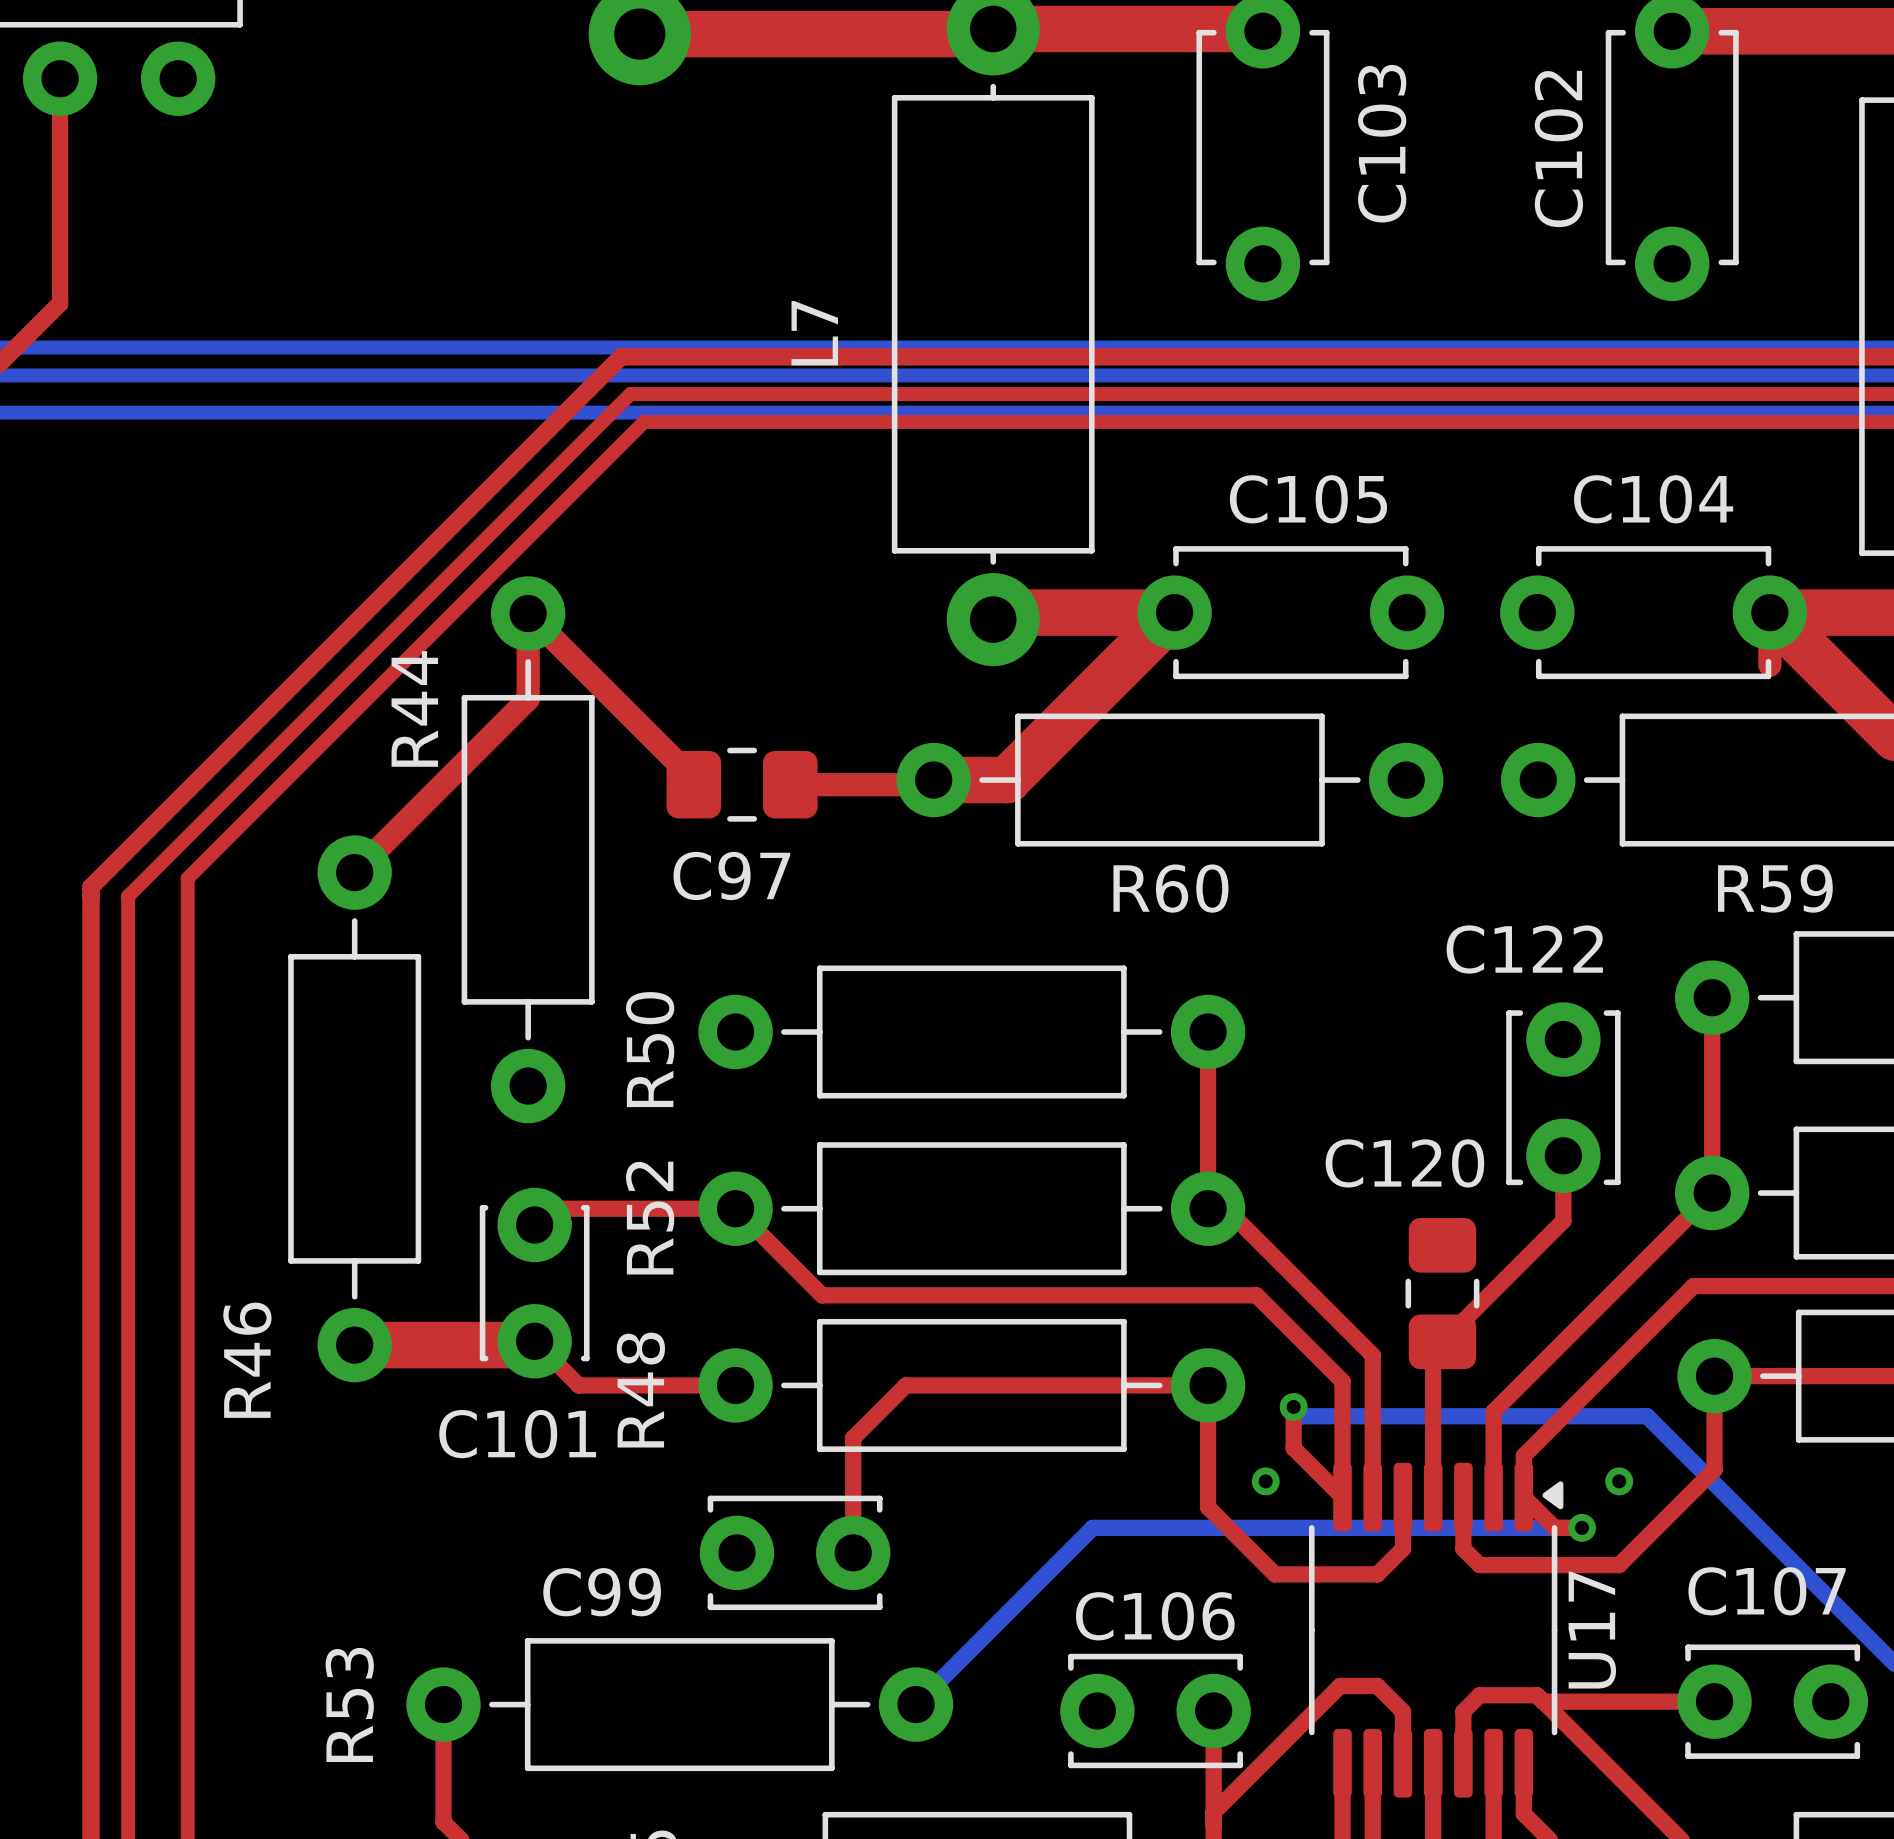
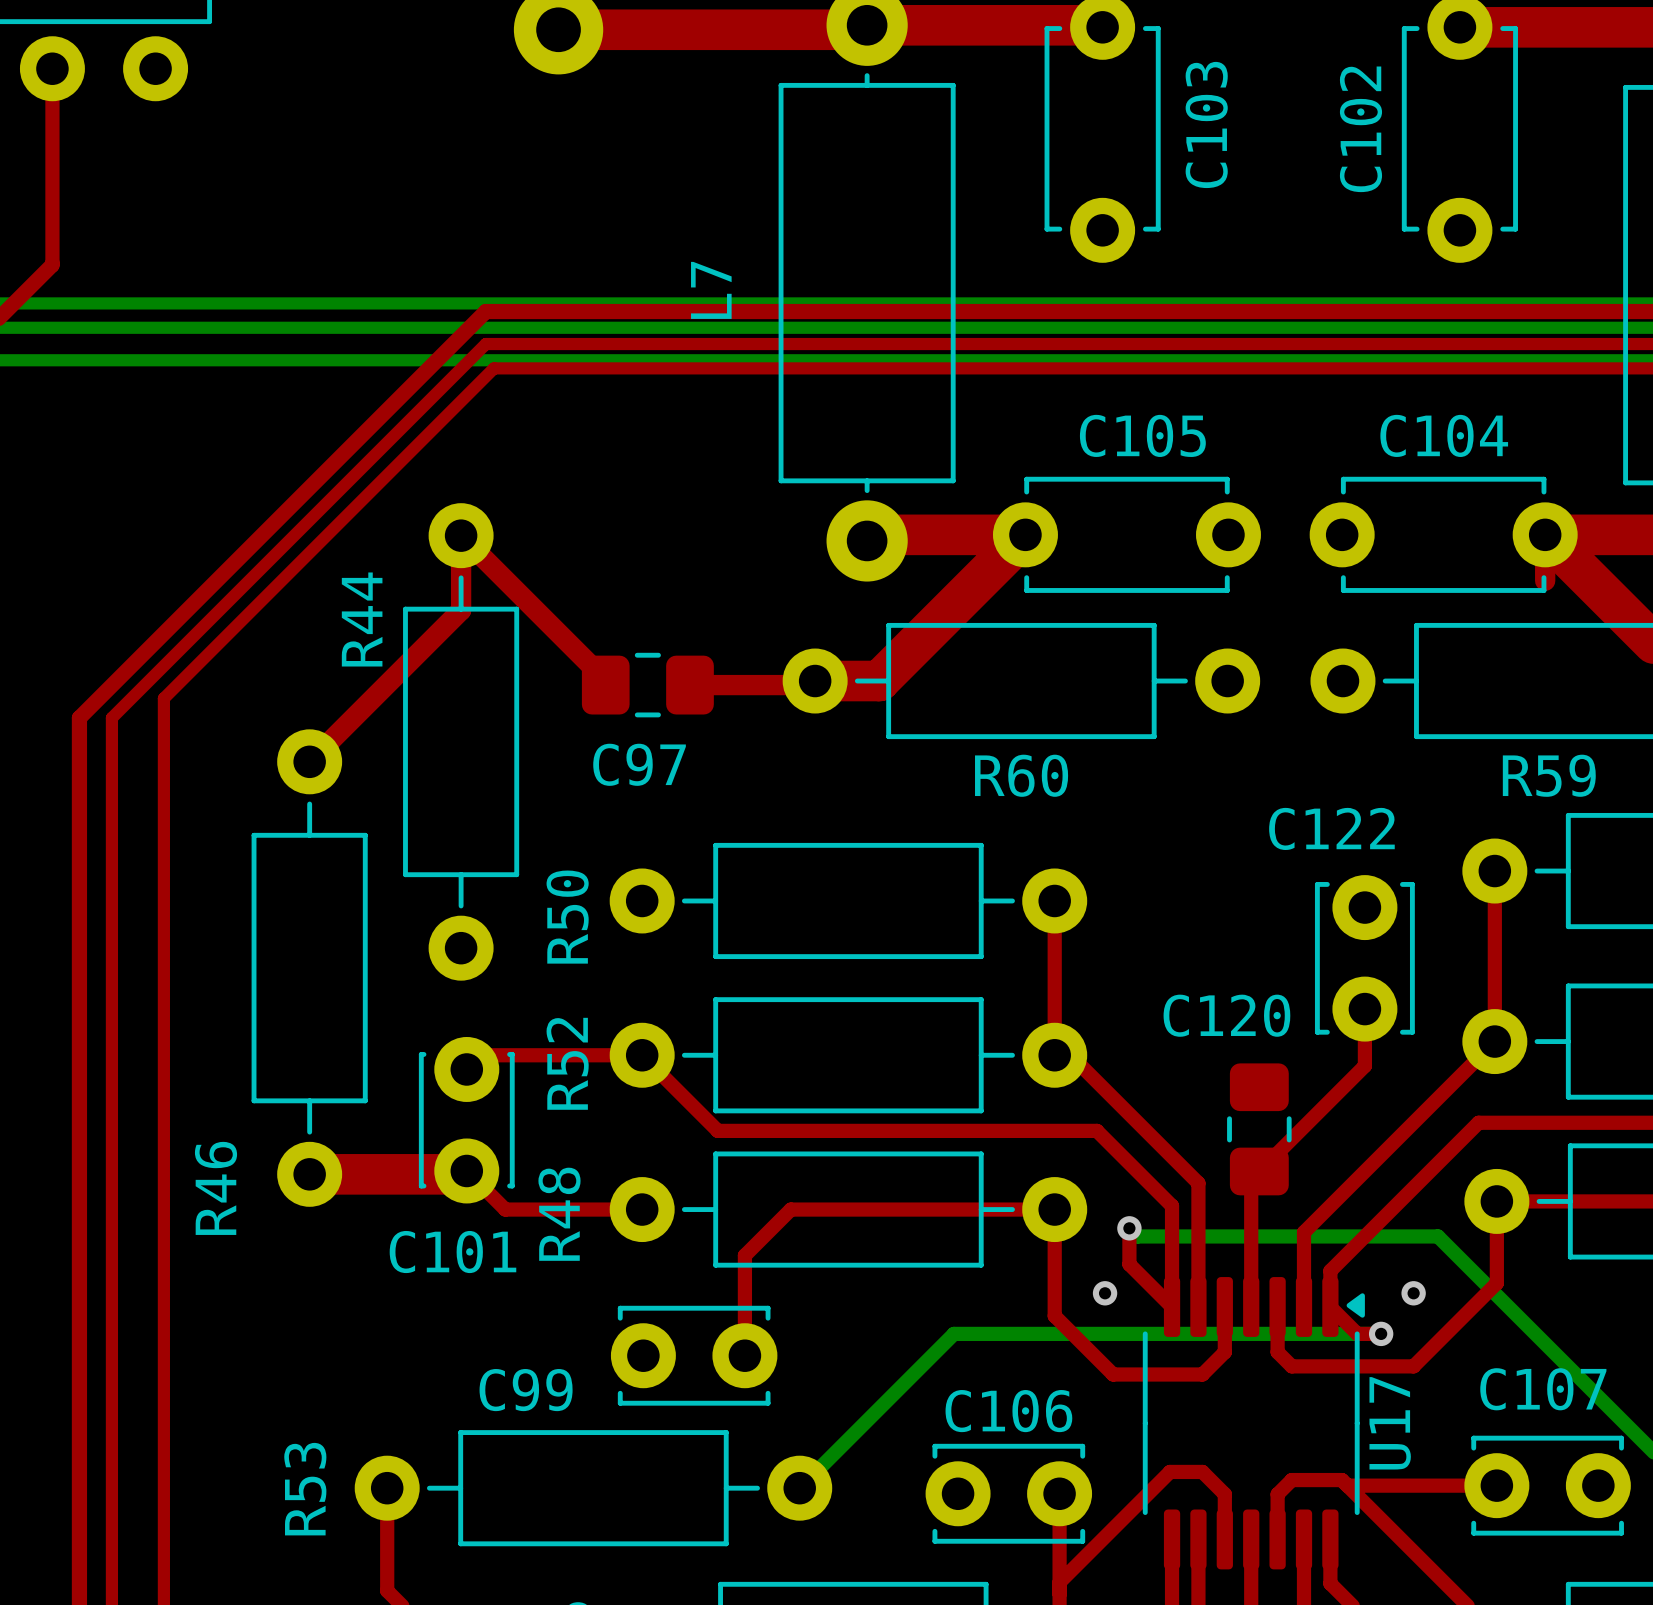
top track: (621, 356) (90, 887) -> (542, 311) (485, 311) (79, 717) (79, 774)
top track: (630, 394) (128, 896) -> (550, 344) (485, 344) (111, 717) (111, 782)
top track: (644, 421) (187, 878) -> (562, 368) (493, 368) (163, 698) (163, 766)

